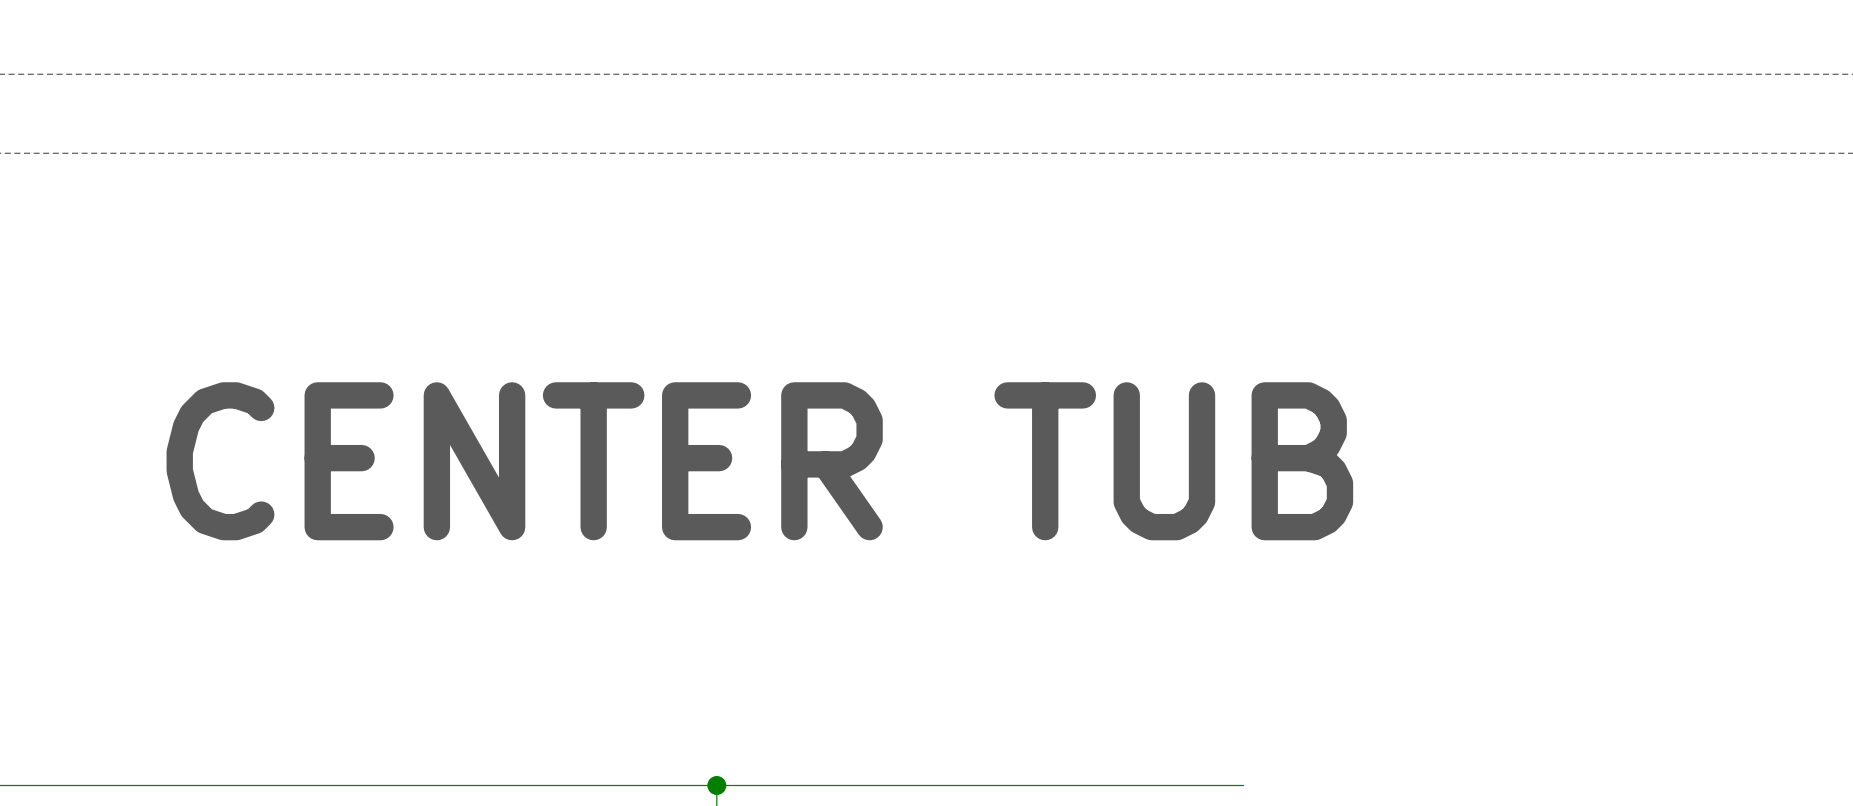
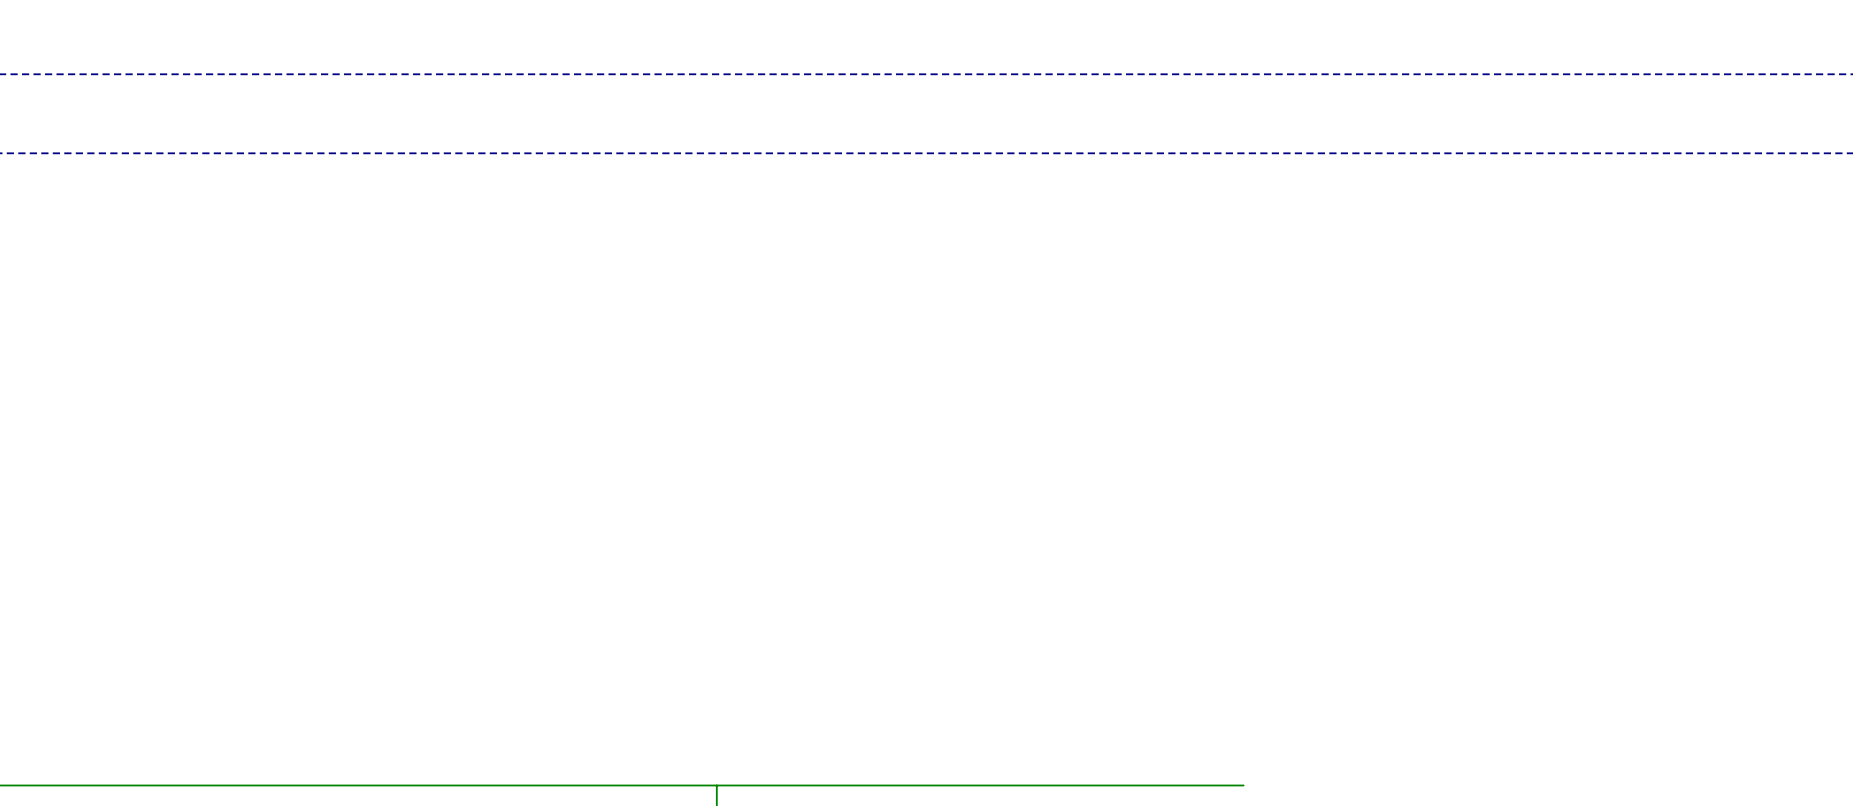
text: CENTER TUB (759, 461) -> none
junction: (716, 785) -> none

